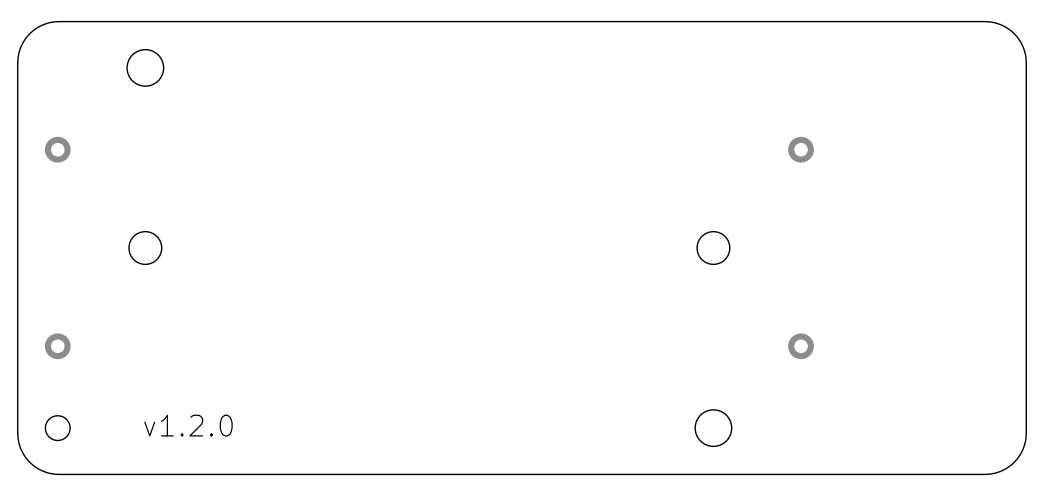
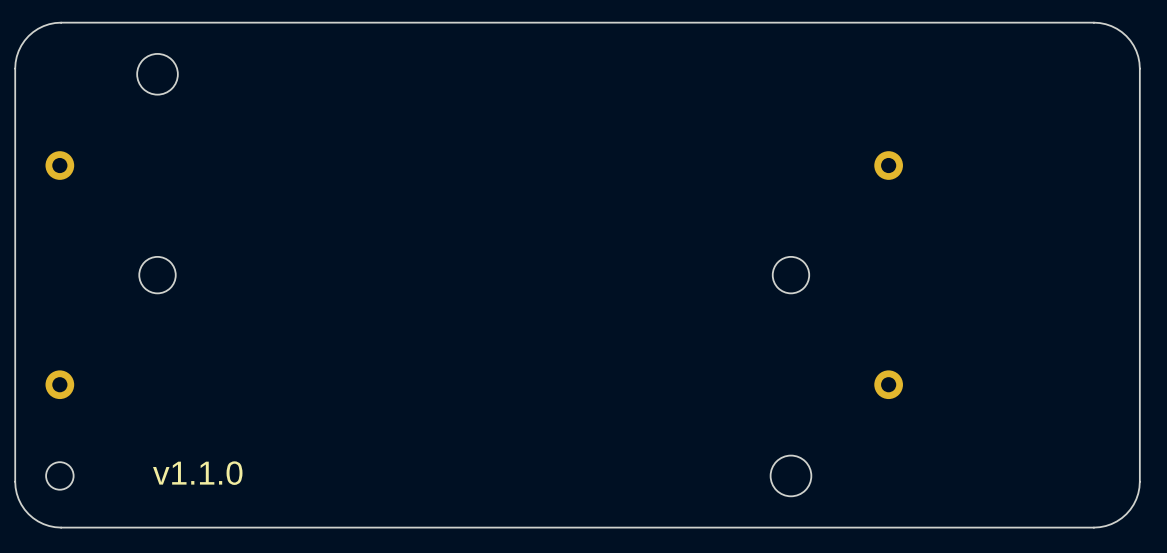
text: v1.2.0 (188, 425) -> v1.1.0 (197, 473)

